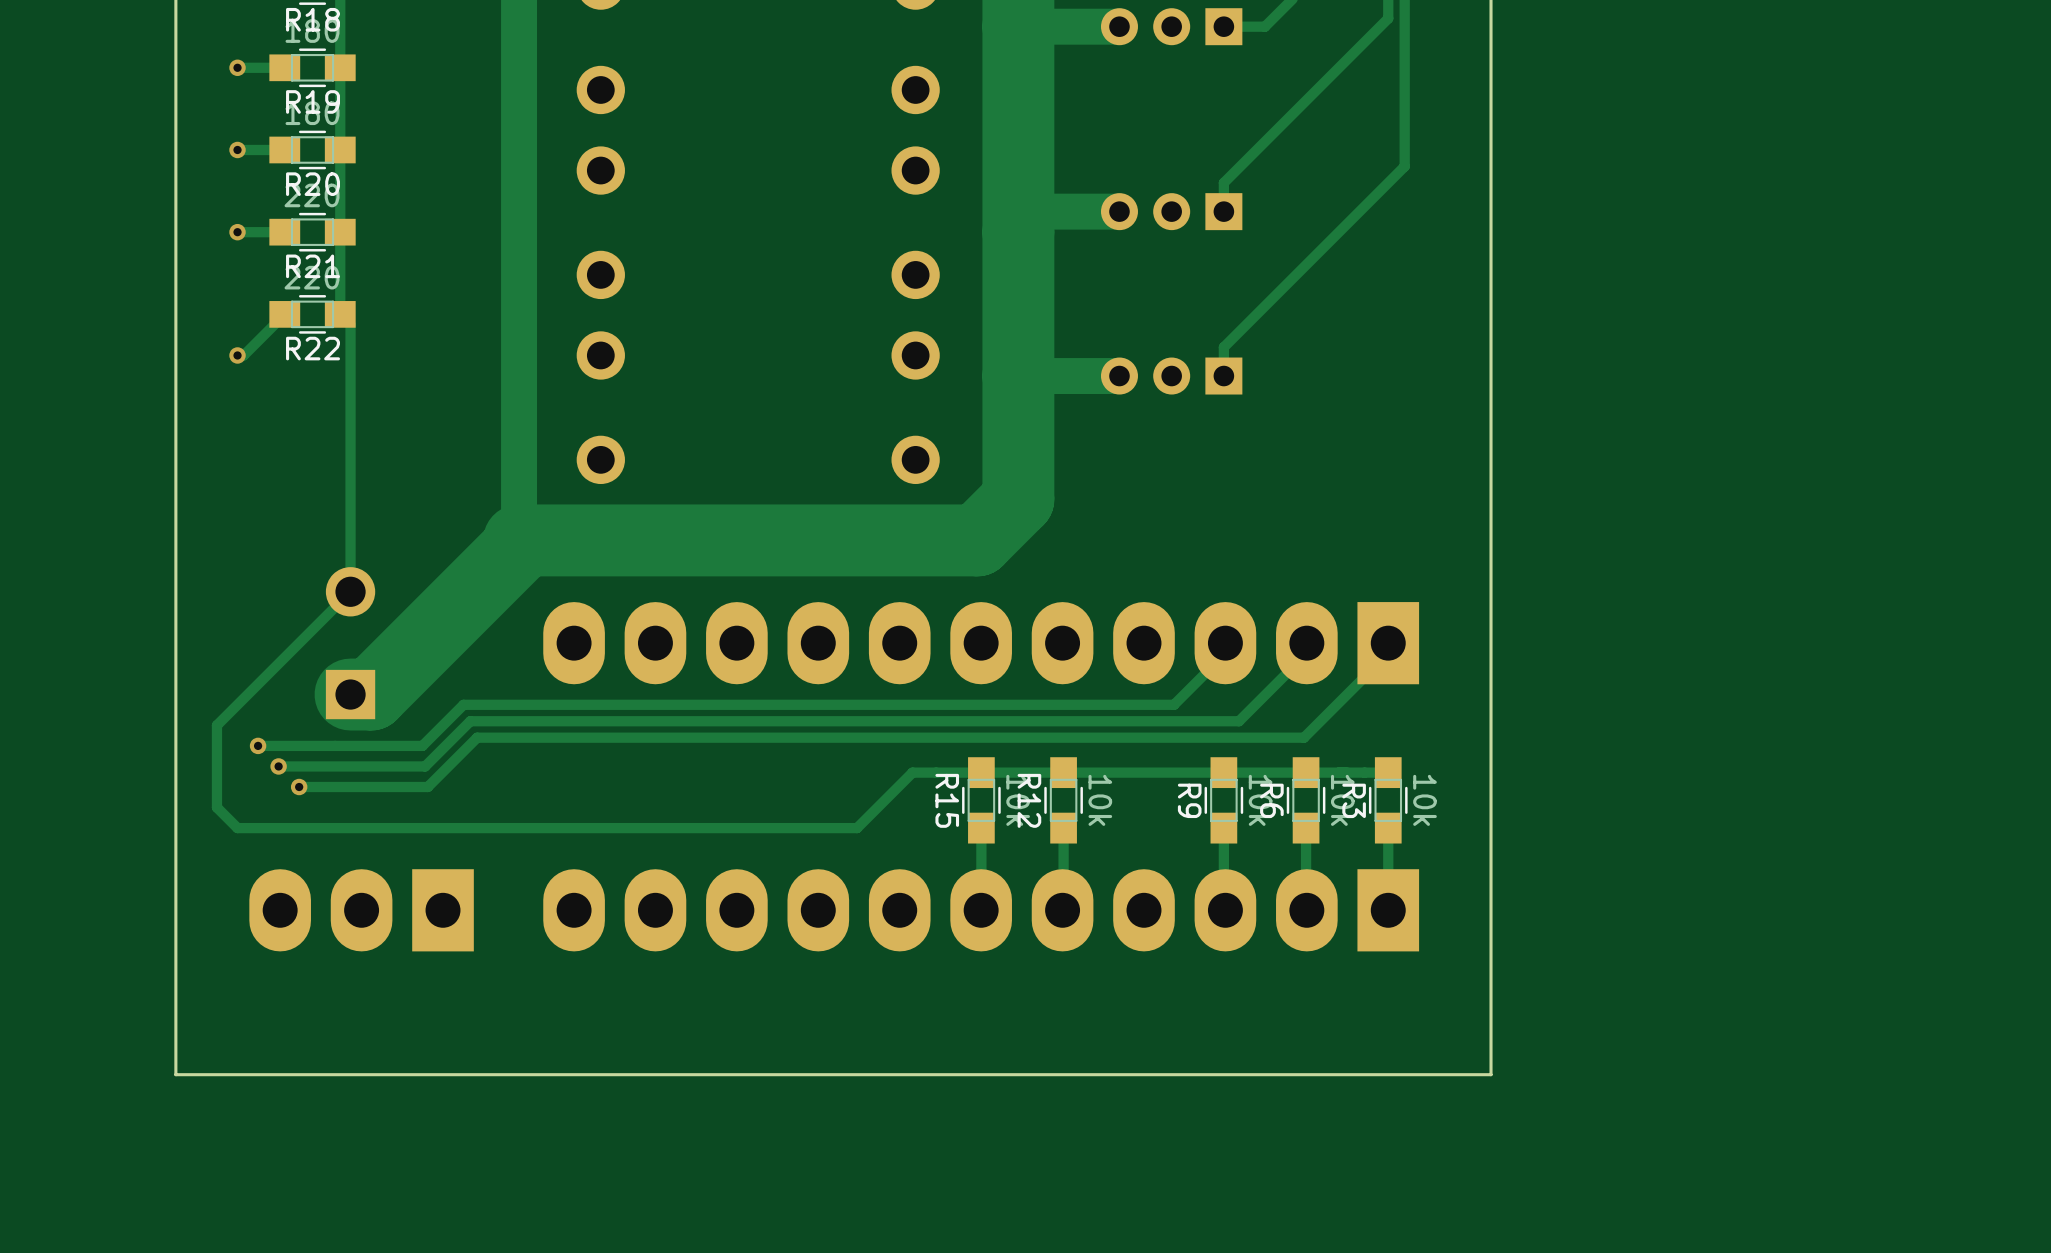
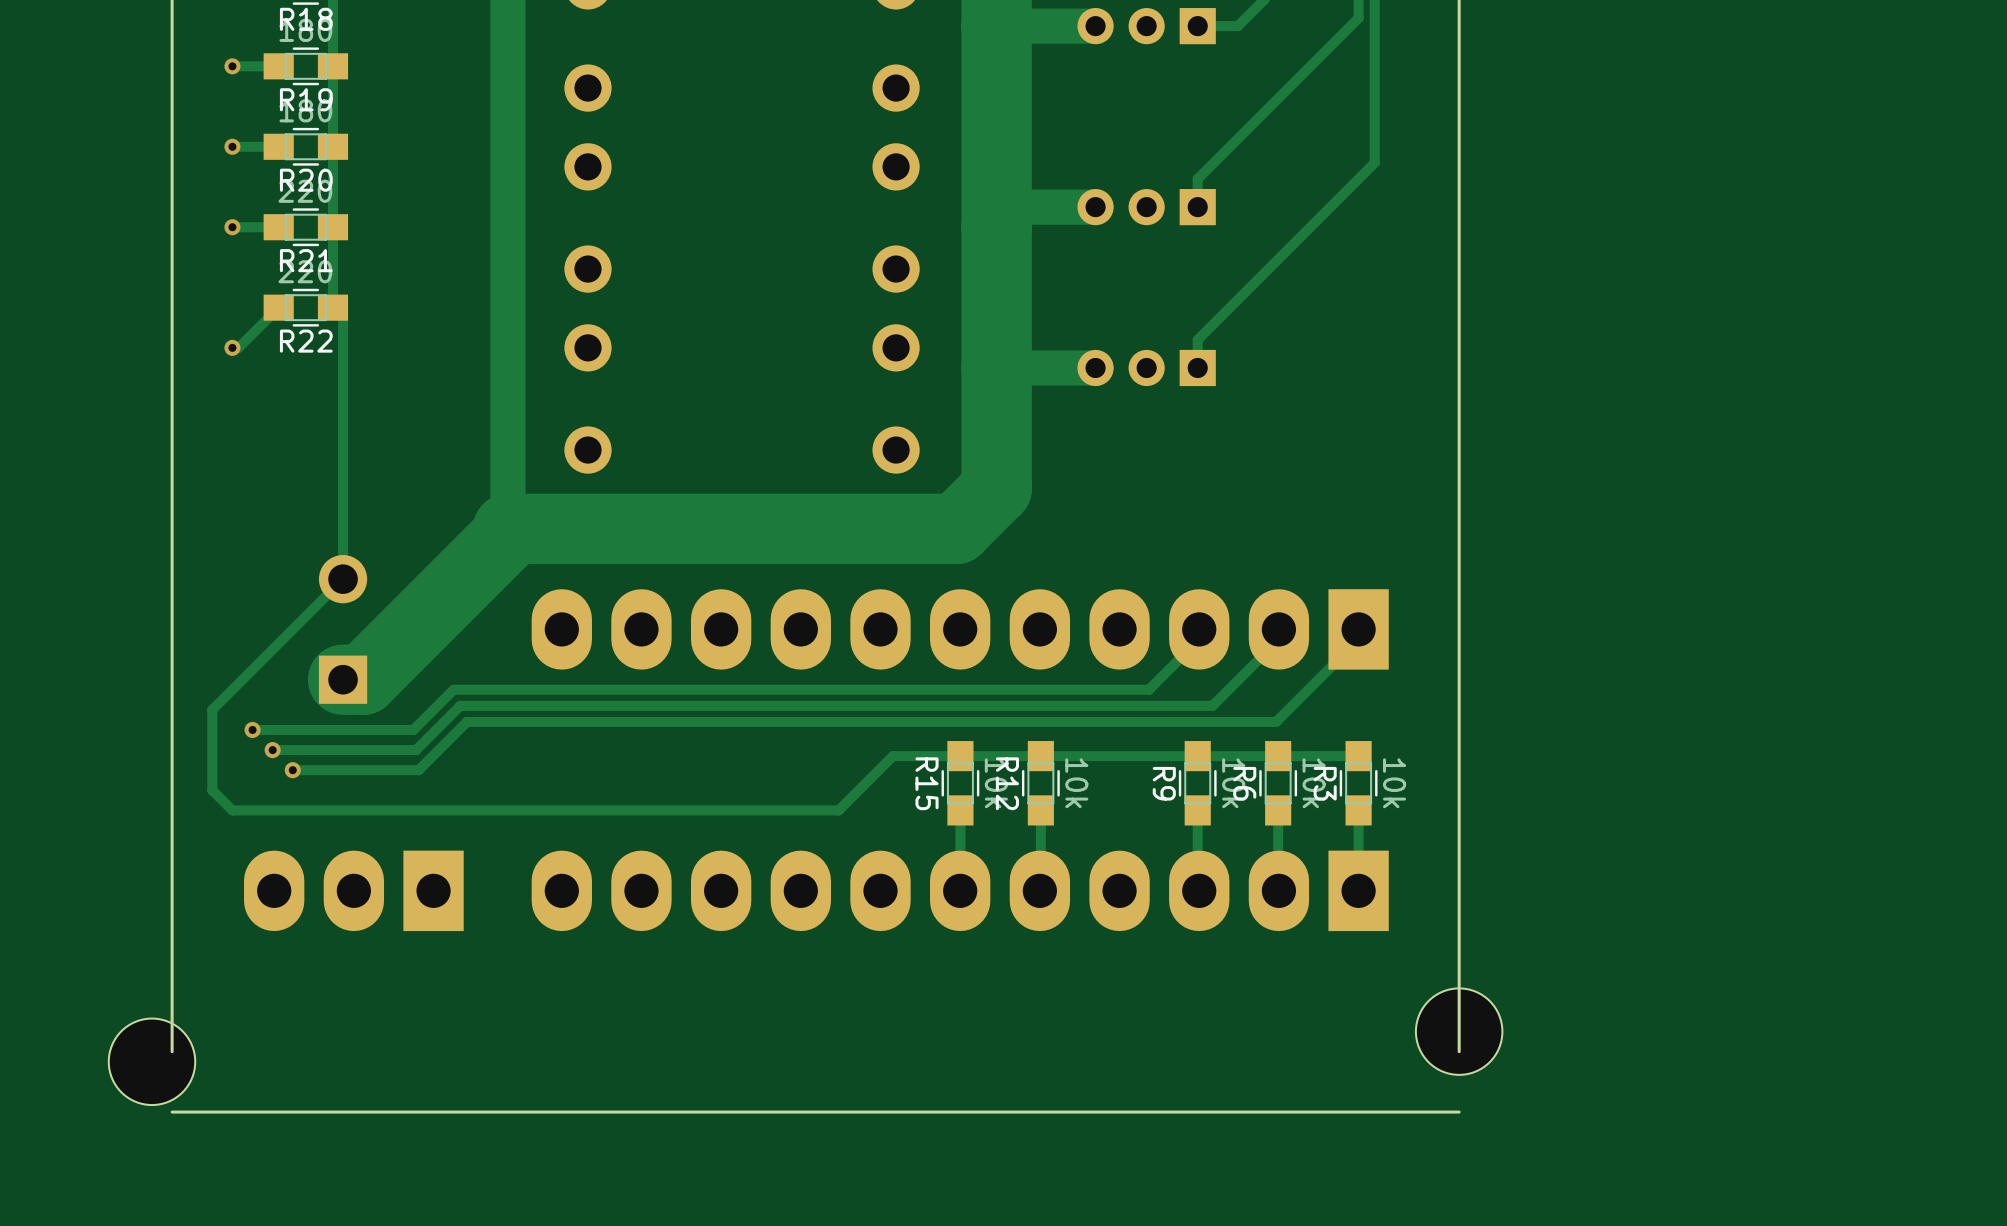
part: none -> (1459, 1031)
board edge: (1491, 1074) (175, 1074) -> (1459, 1112) (172, 1112)
part: none -> (152, 1061)

